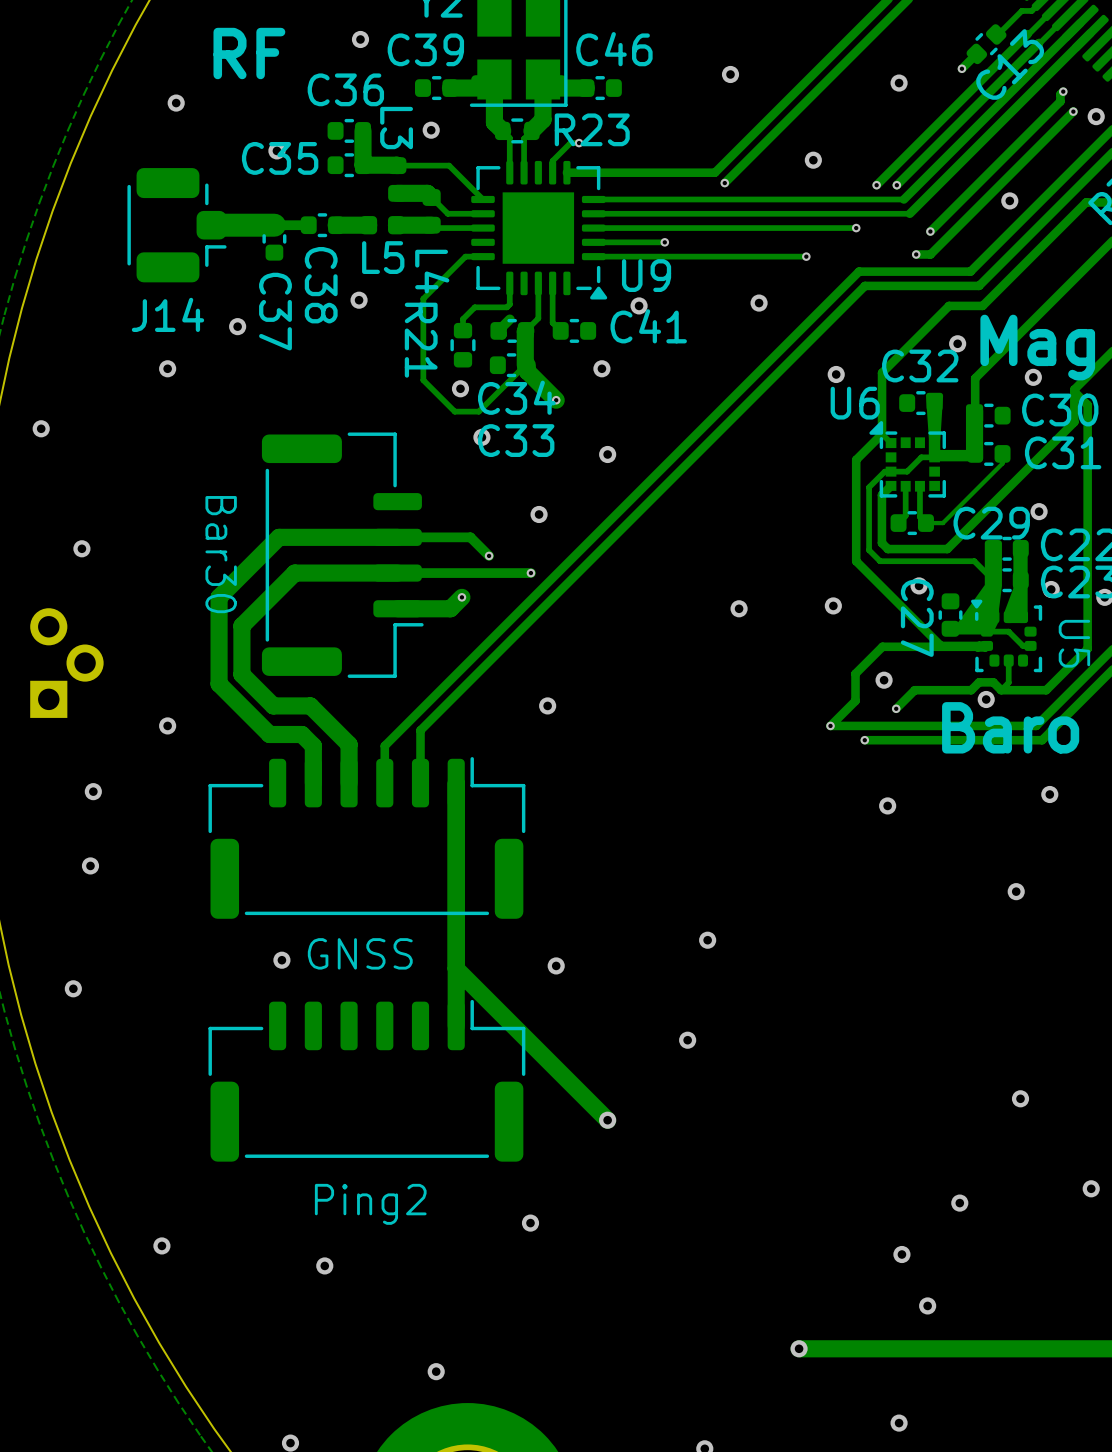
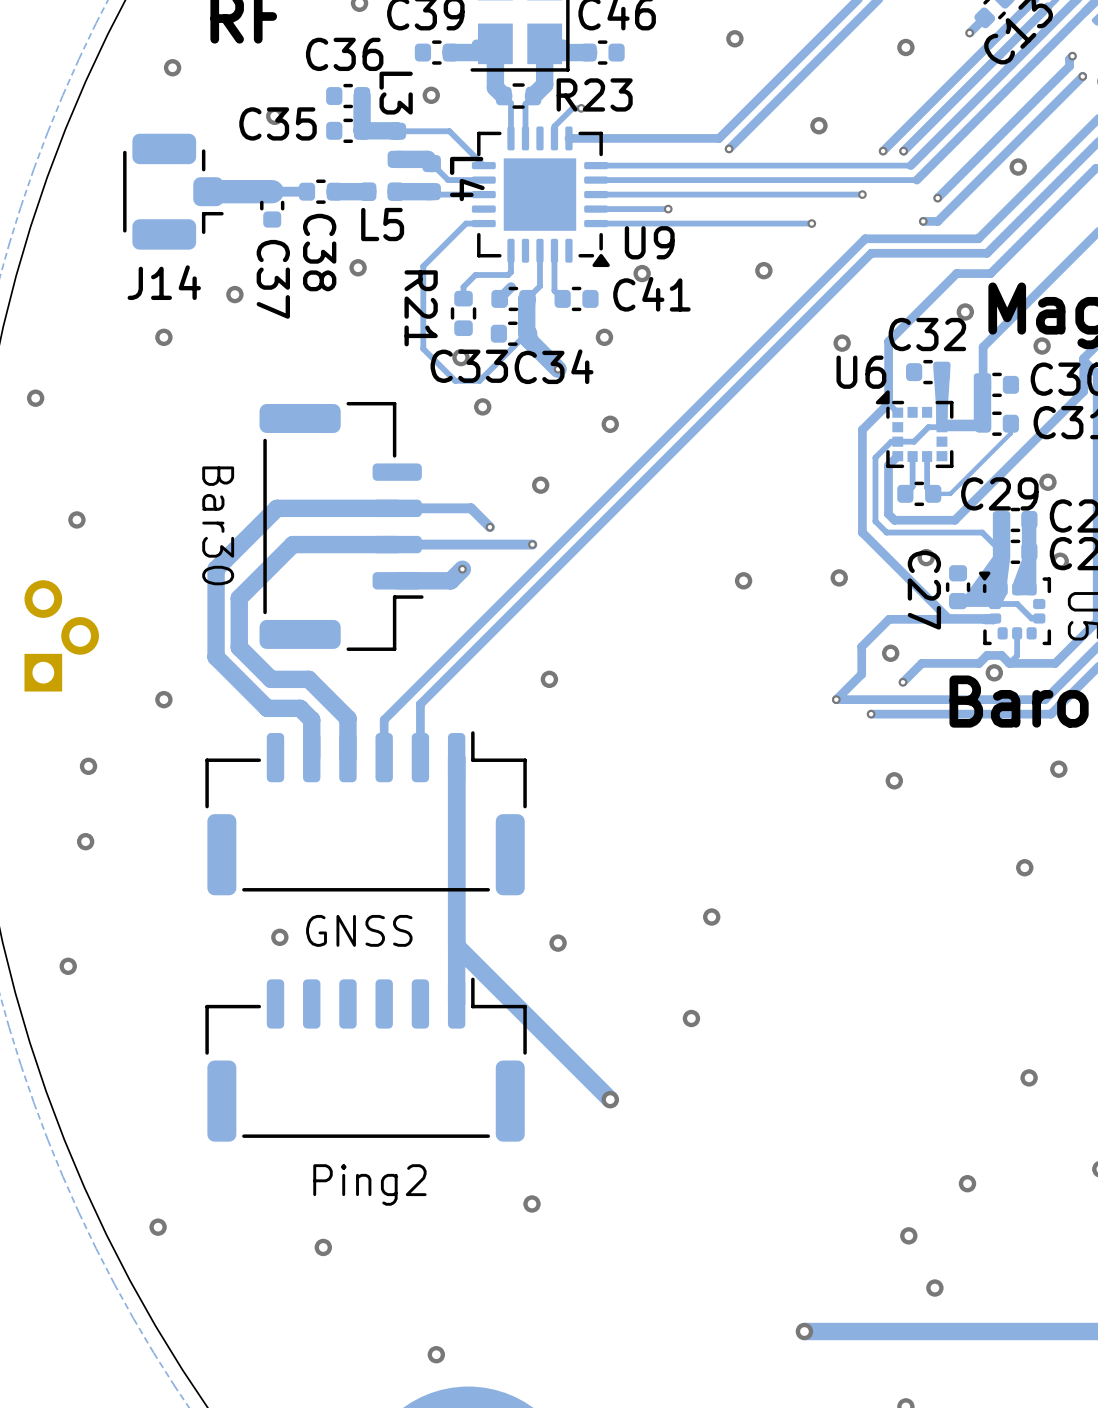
L4 name position: L4 (432, 271) -> L4 (467, 179)
C34 name position: C34 (516, 397) -> C34 (554, 366)
C33 name position: C33 (516, 440) -> C33 (469, 366)

